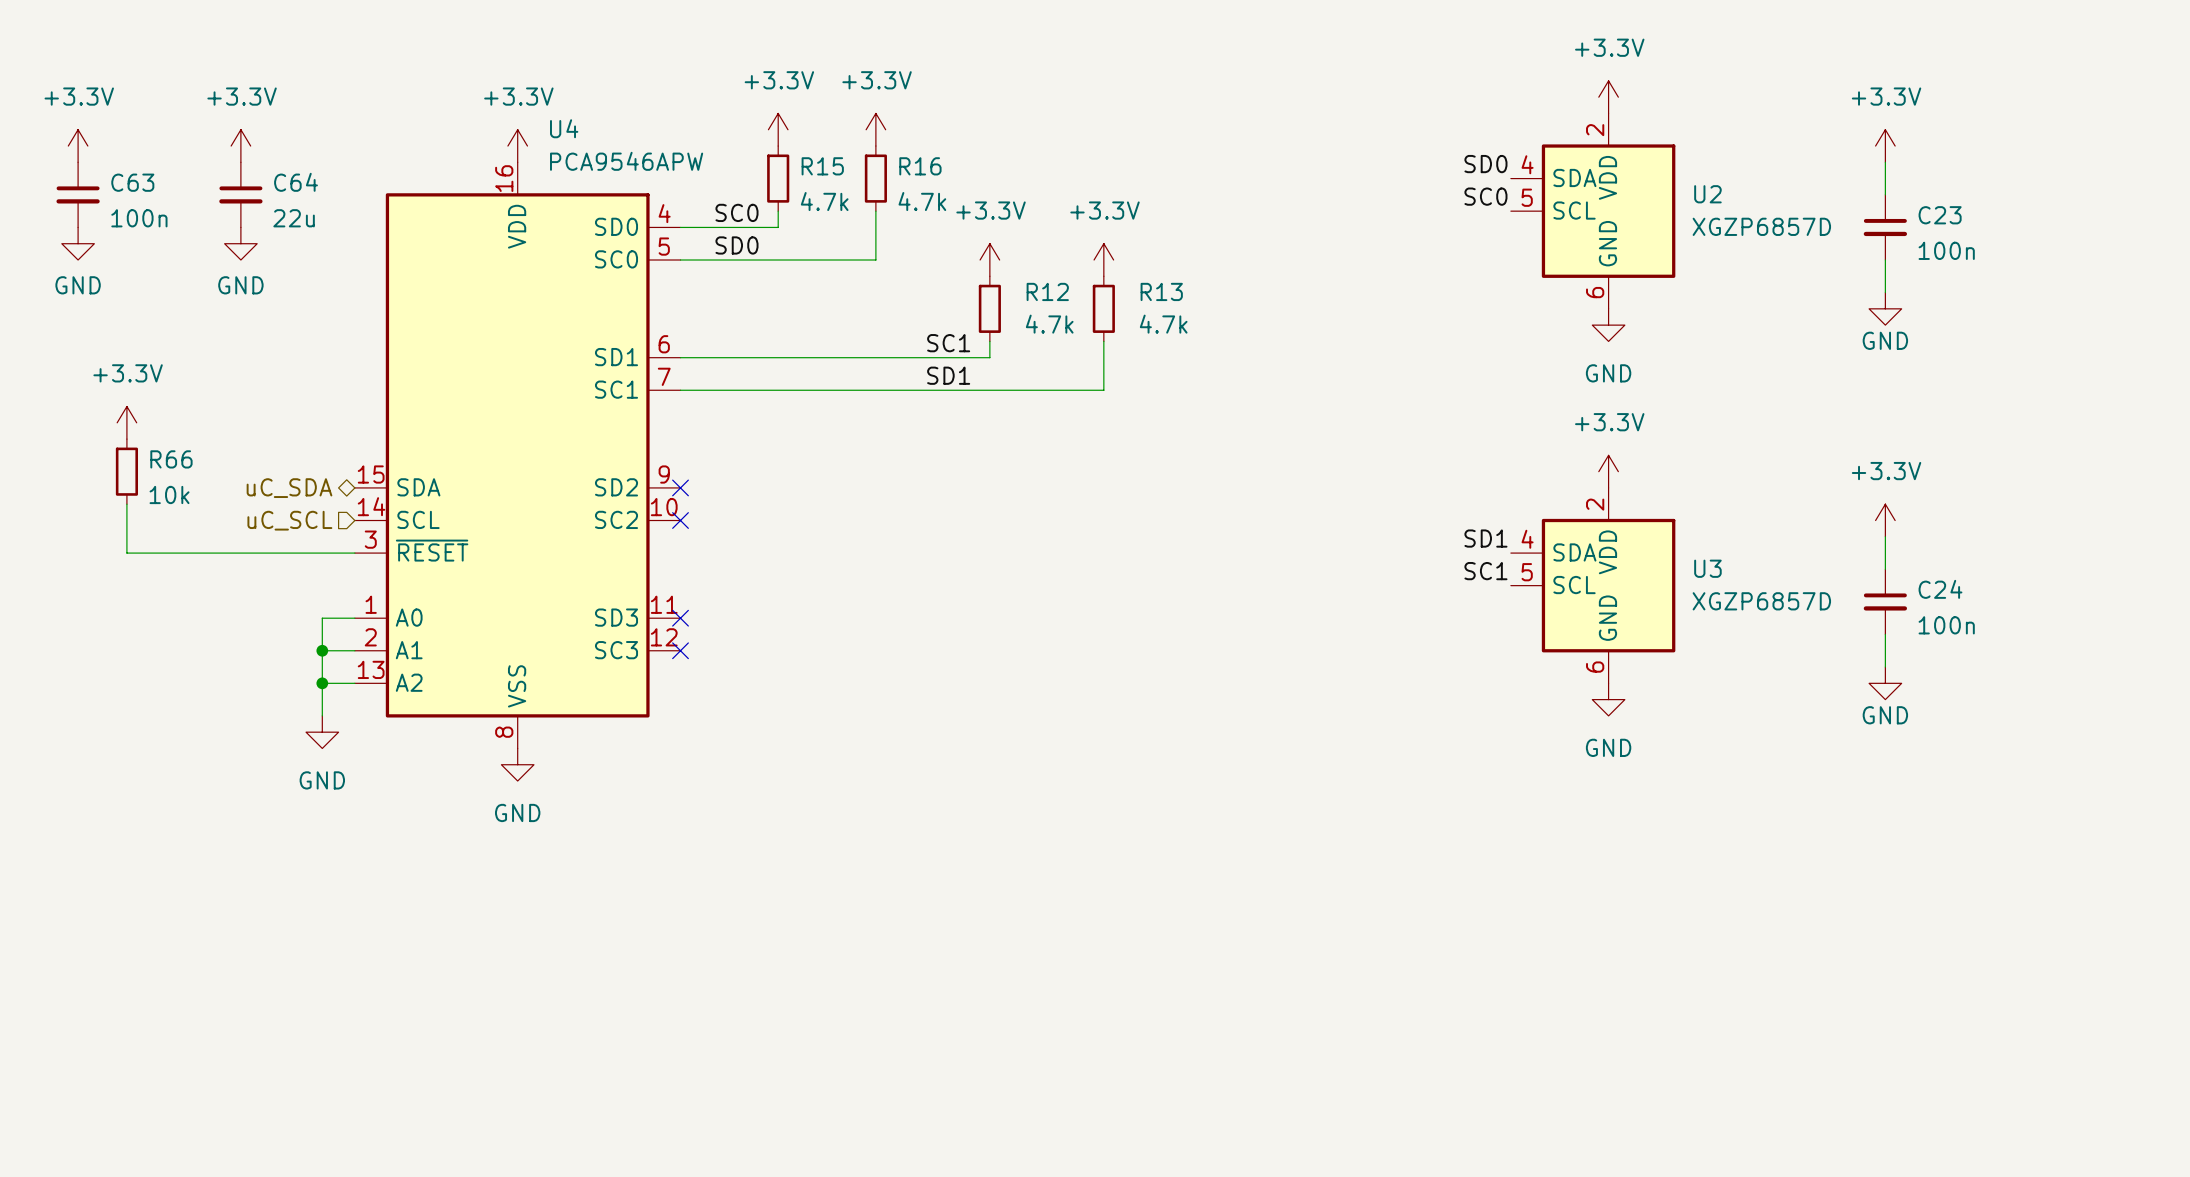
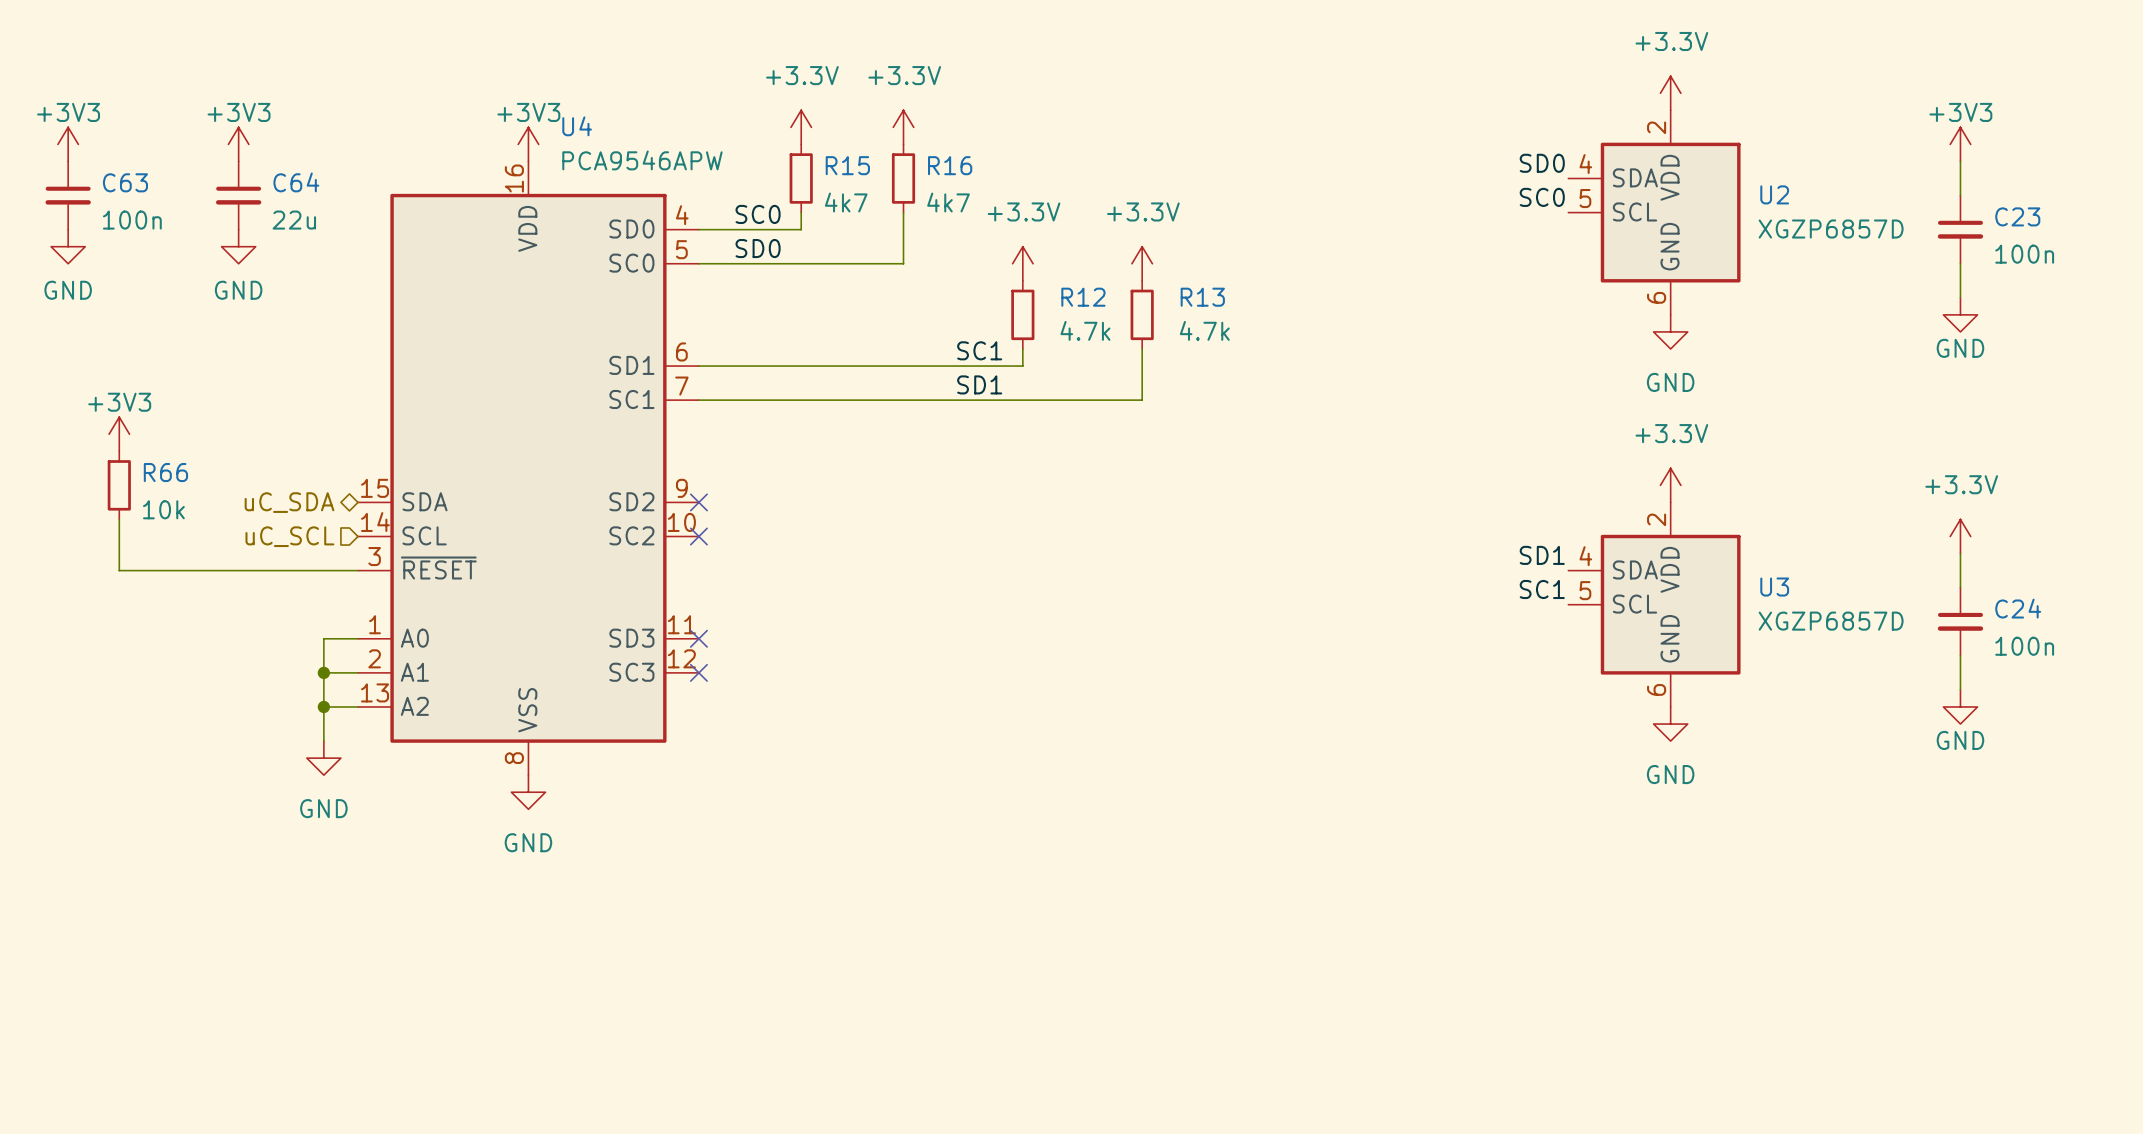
power symbol: +3.3V (78, 146) -> +3V3 (68, 144)
power symbol: +3.3V (240, 146) -> +3V3 (238, 144)
power symbol: +3.3V (517, 146) -> +3V3 (528, 144)
power symbol: +3.3V (1885, 146) -> +3V3 (1960, 144)
R15 value: 4.7k (824, 201) -> 4k7 (846, 202)
R16 value: 4.7k (922, 201) -> 4k7 (948, 202)
power symbol: +3.3V (126, 422) -> +3V3 (119, 434)

